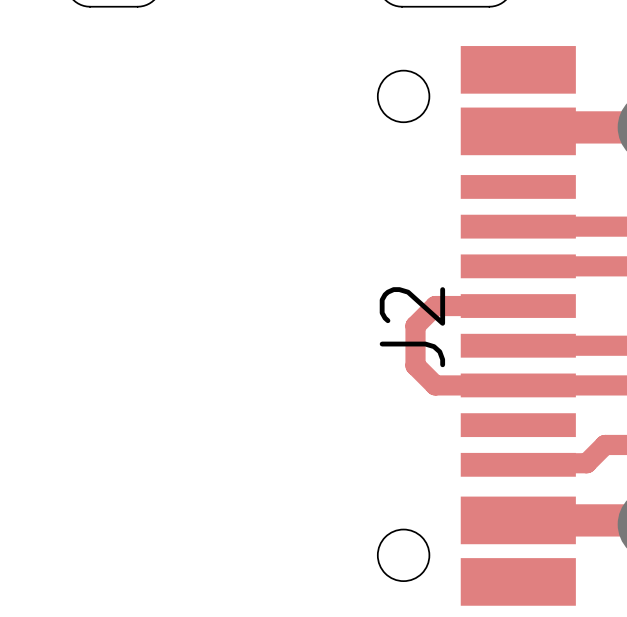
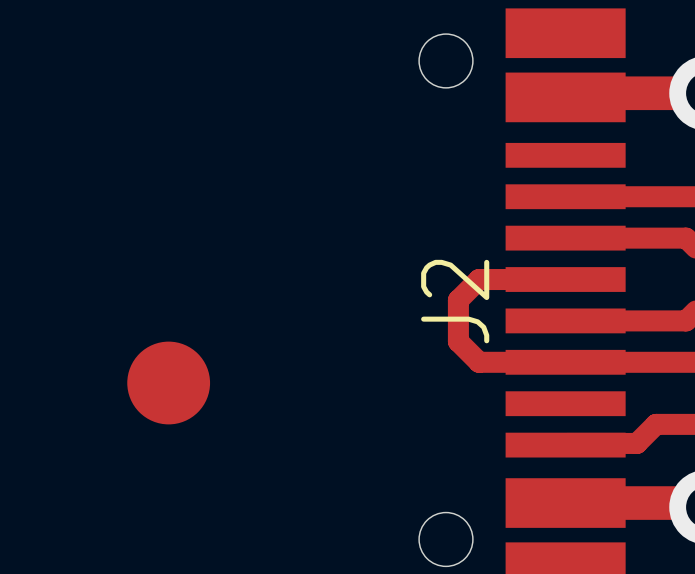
part: none -> (168, 383)

